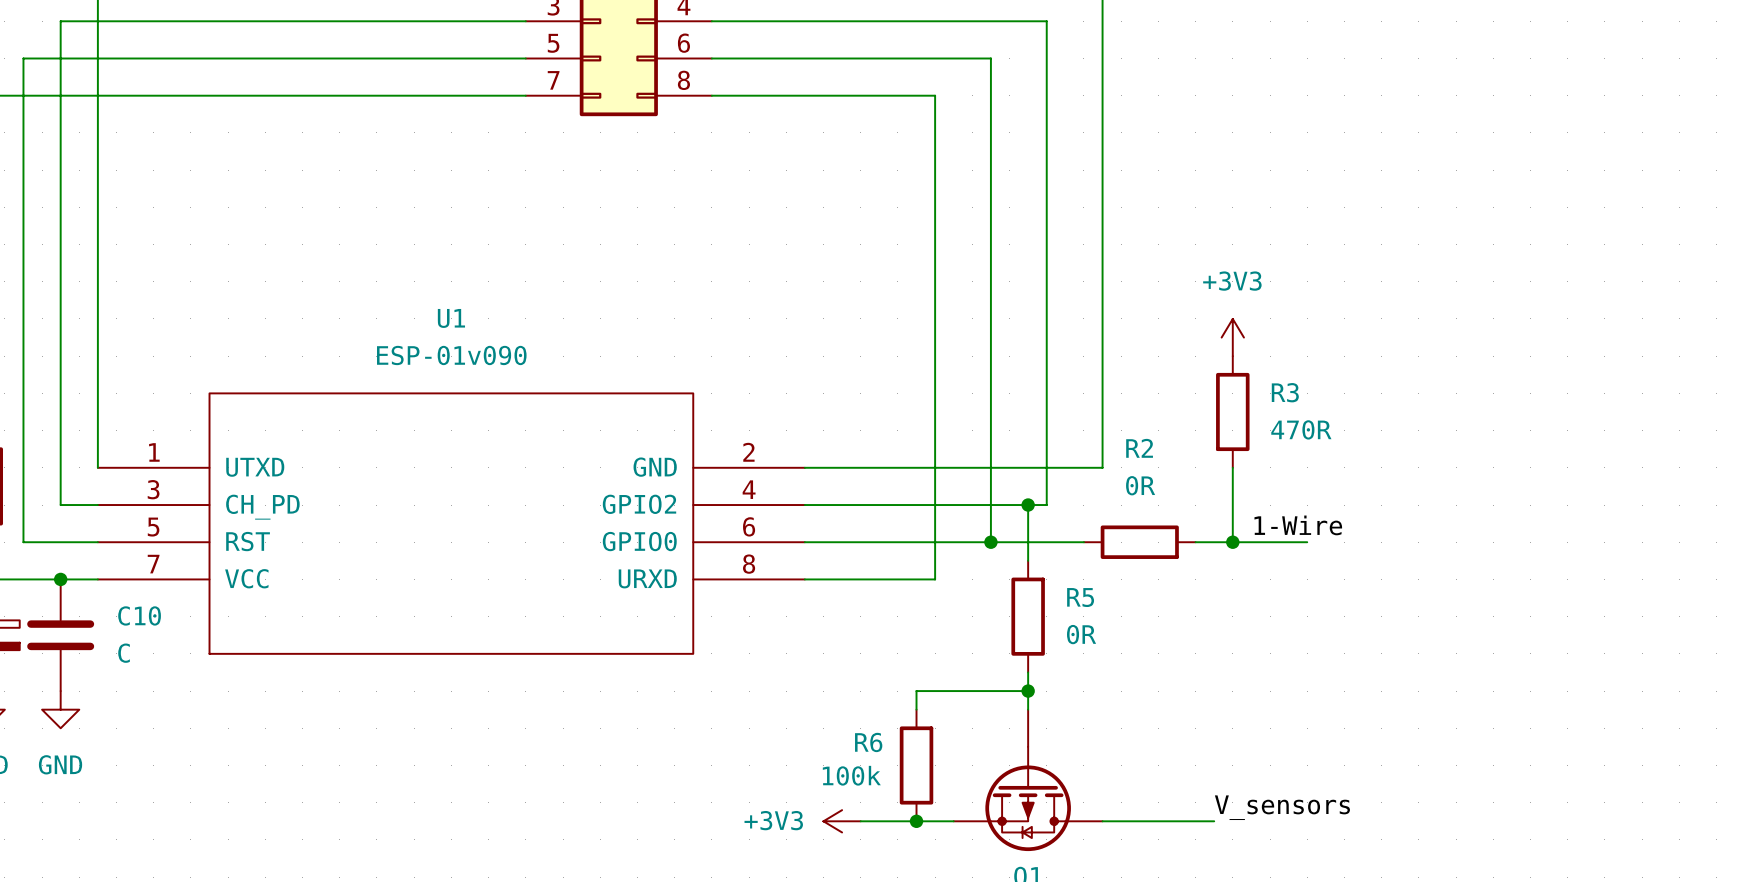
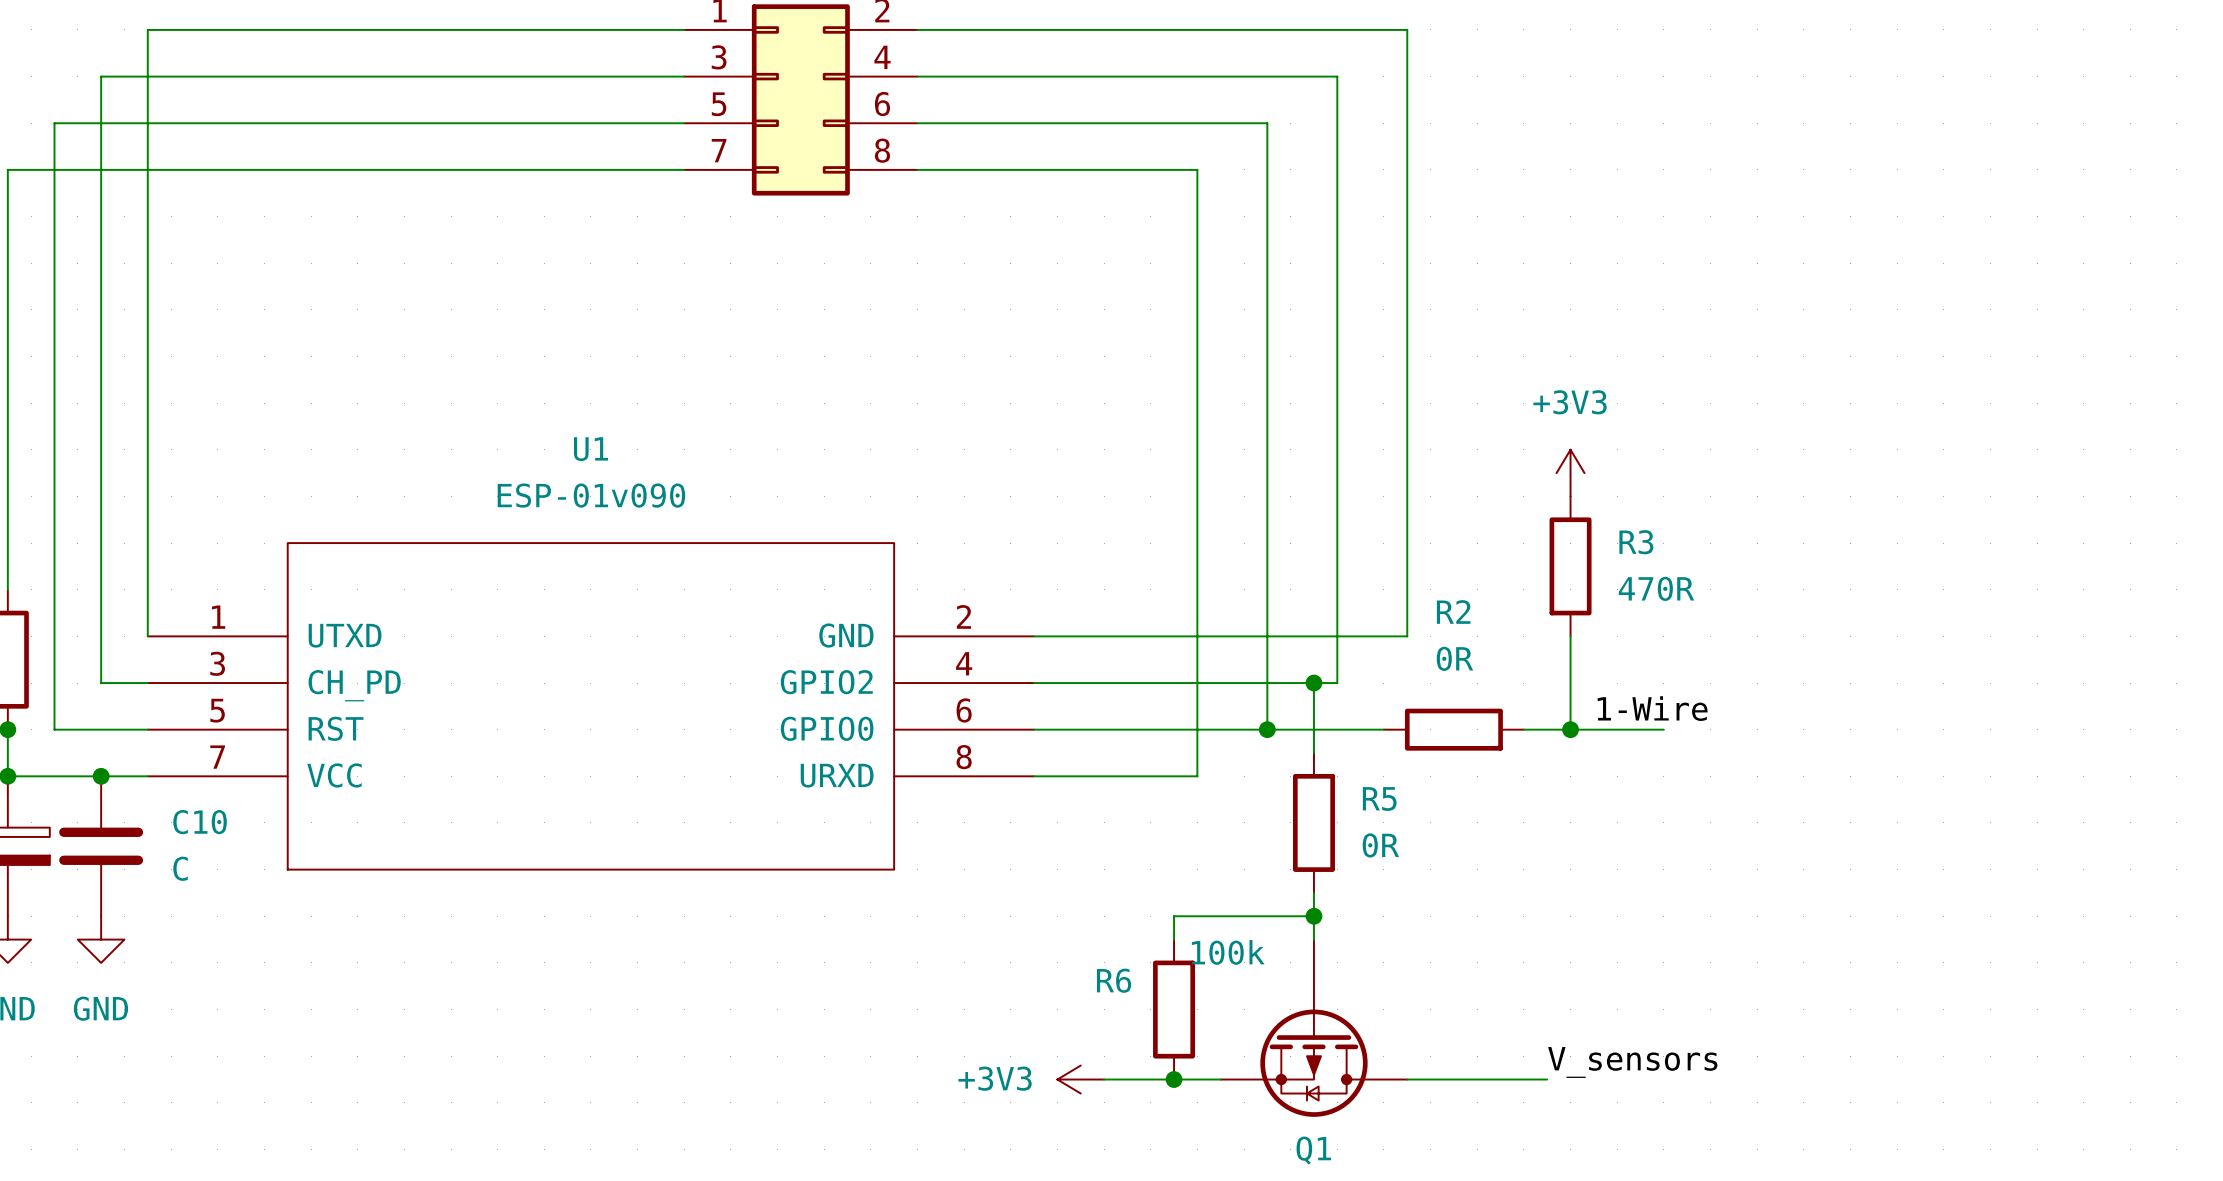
R6 value position: 100k (851, 775) -> 100k (1228, 952)

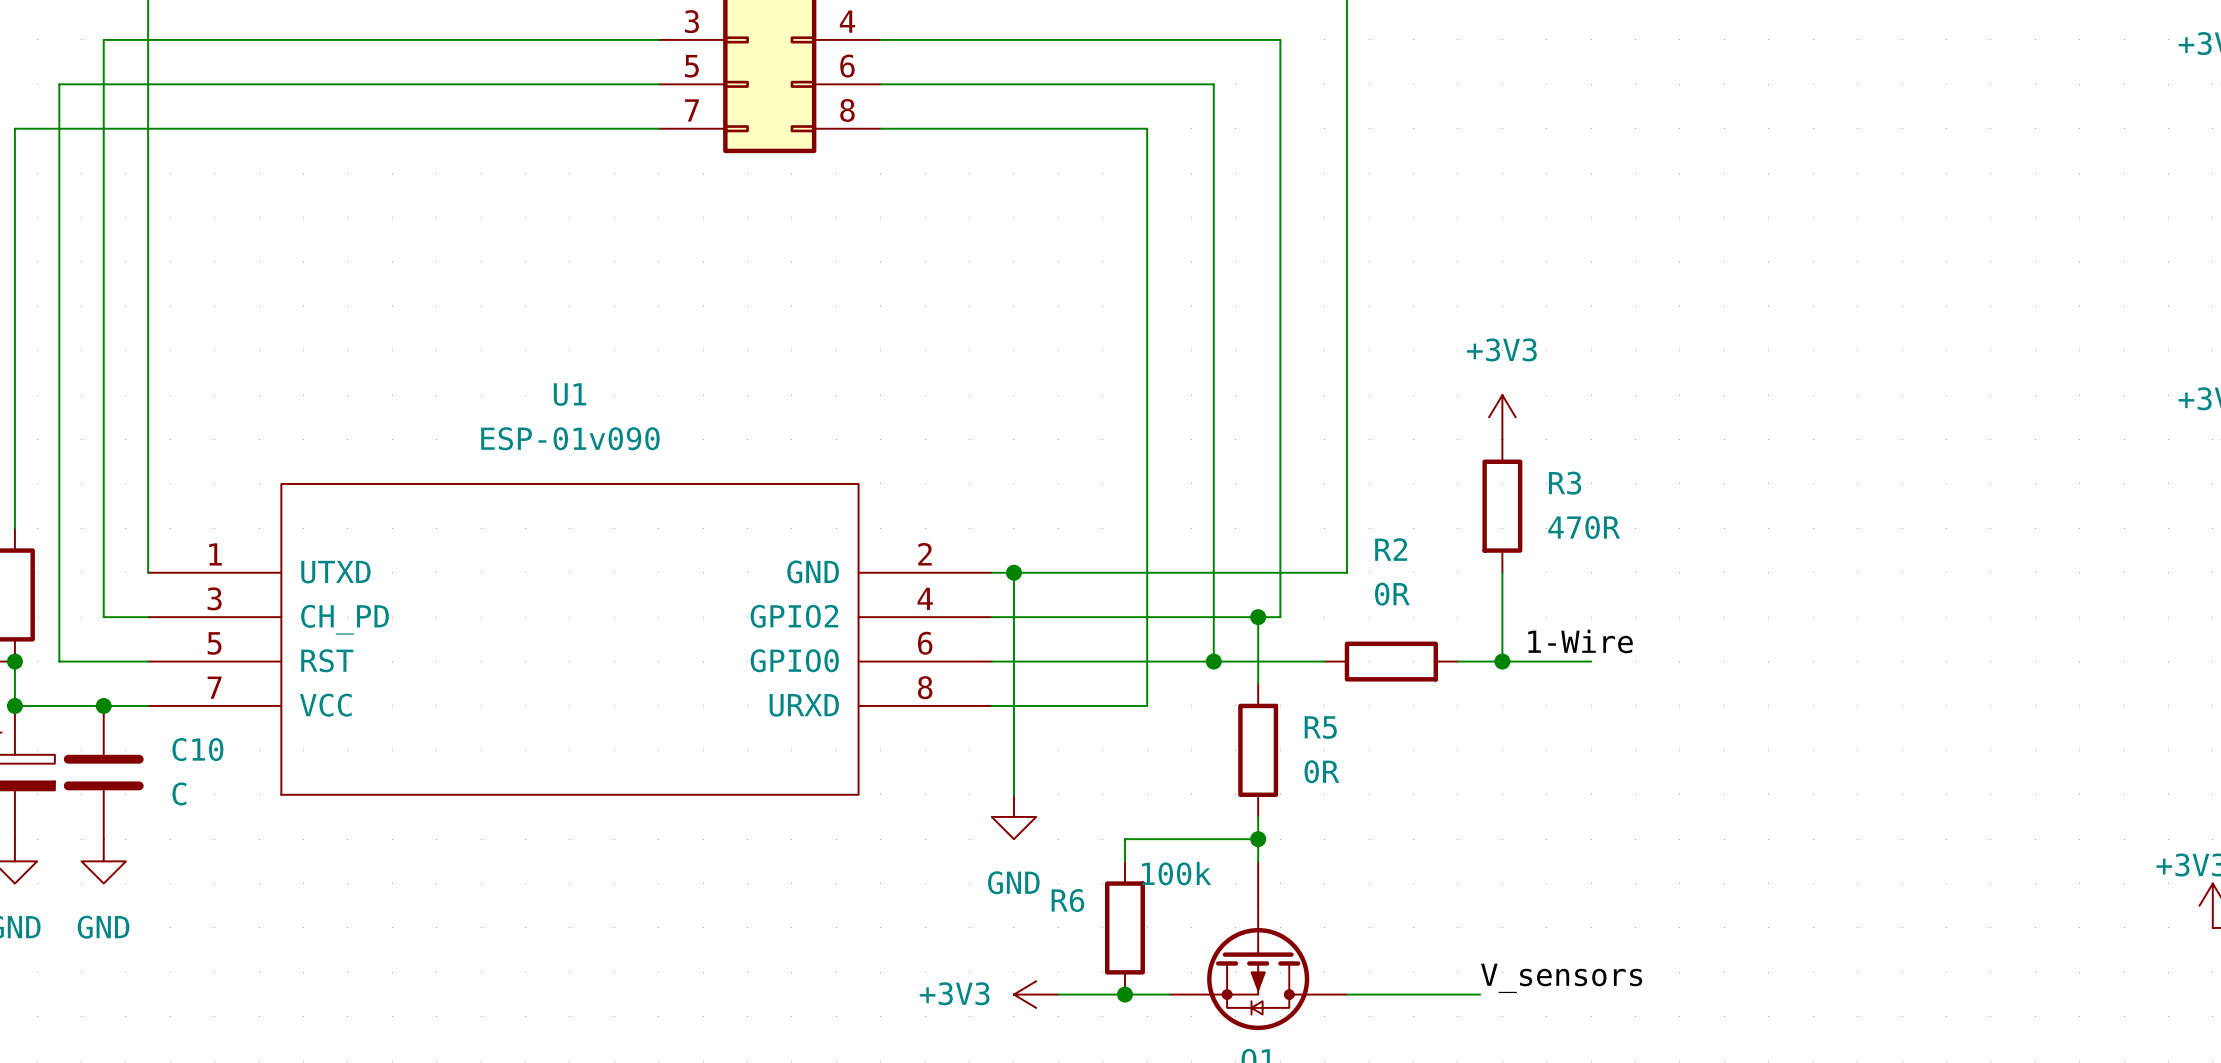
wire: none -> (1013, 572) (1013, 794)
junction: none -> (1013, 572)
power symbol: none -> GND (1013, 816)

